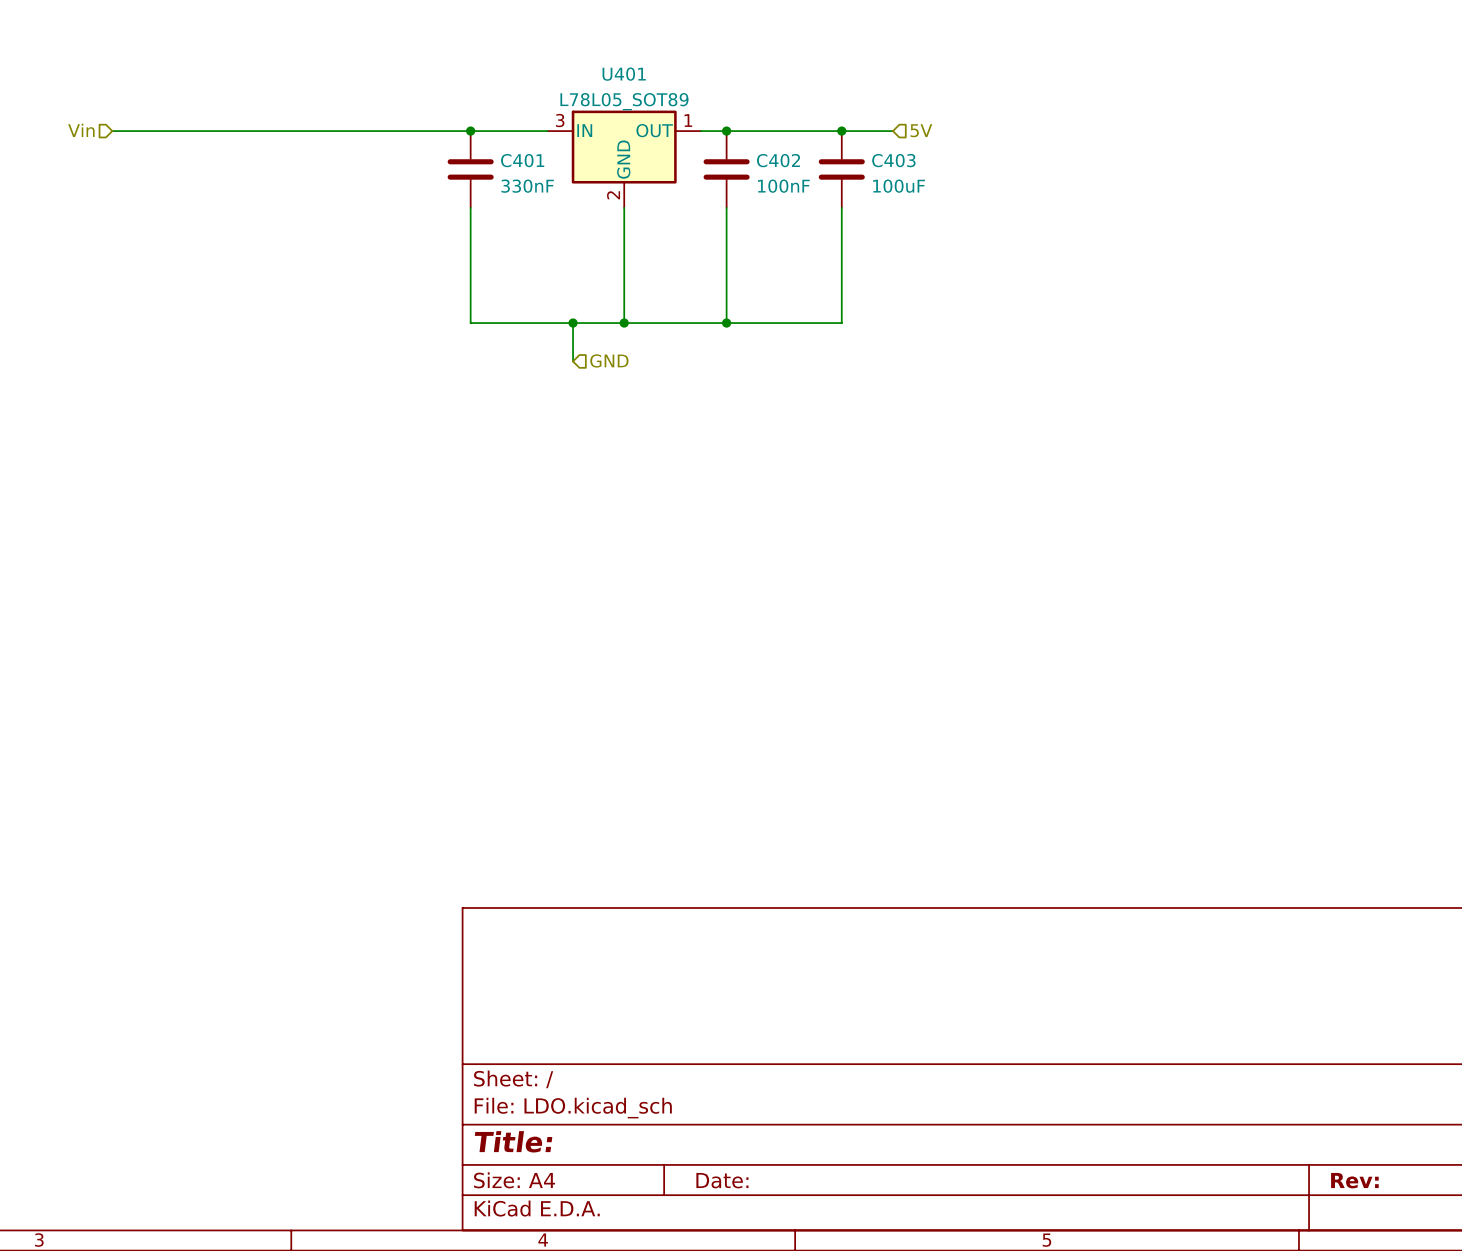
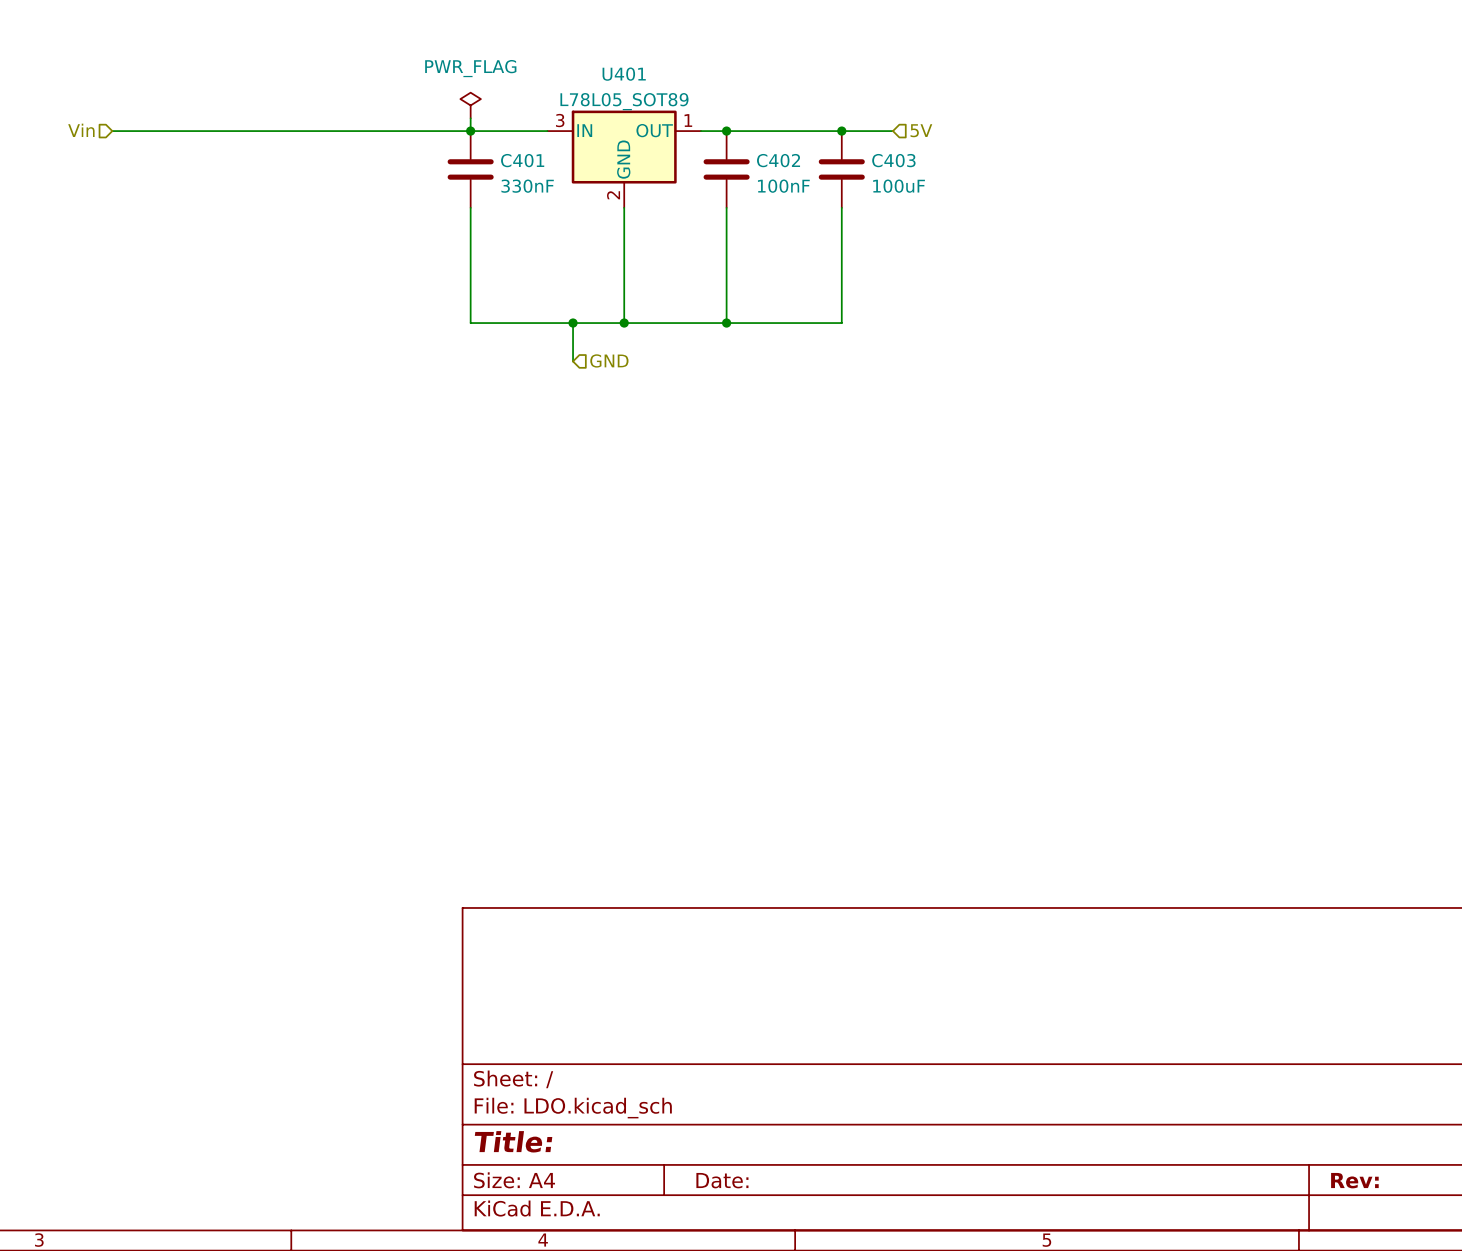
power symbol: none -> PWR_FLAG (470, 105)
wire: none -> (470, 118) (470, 131)

